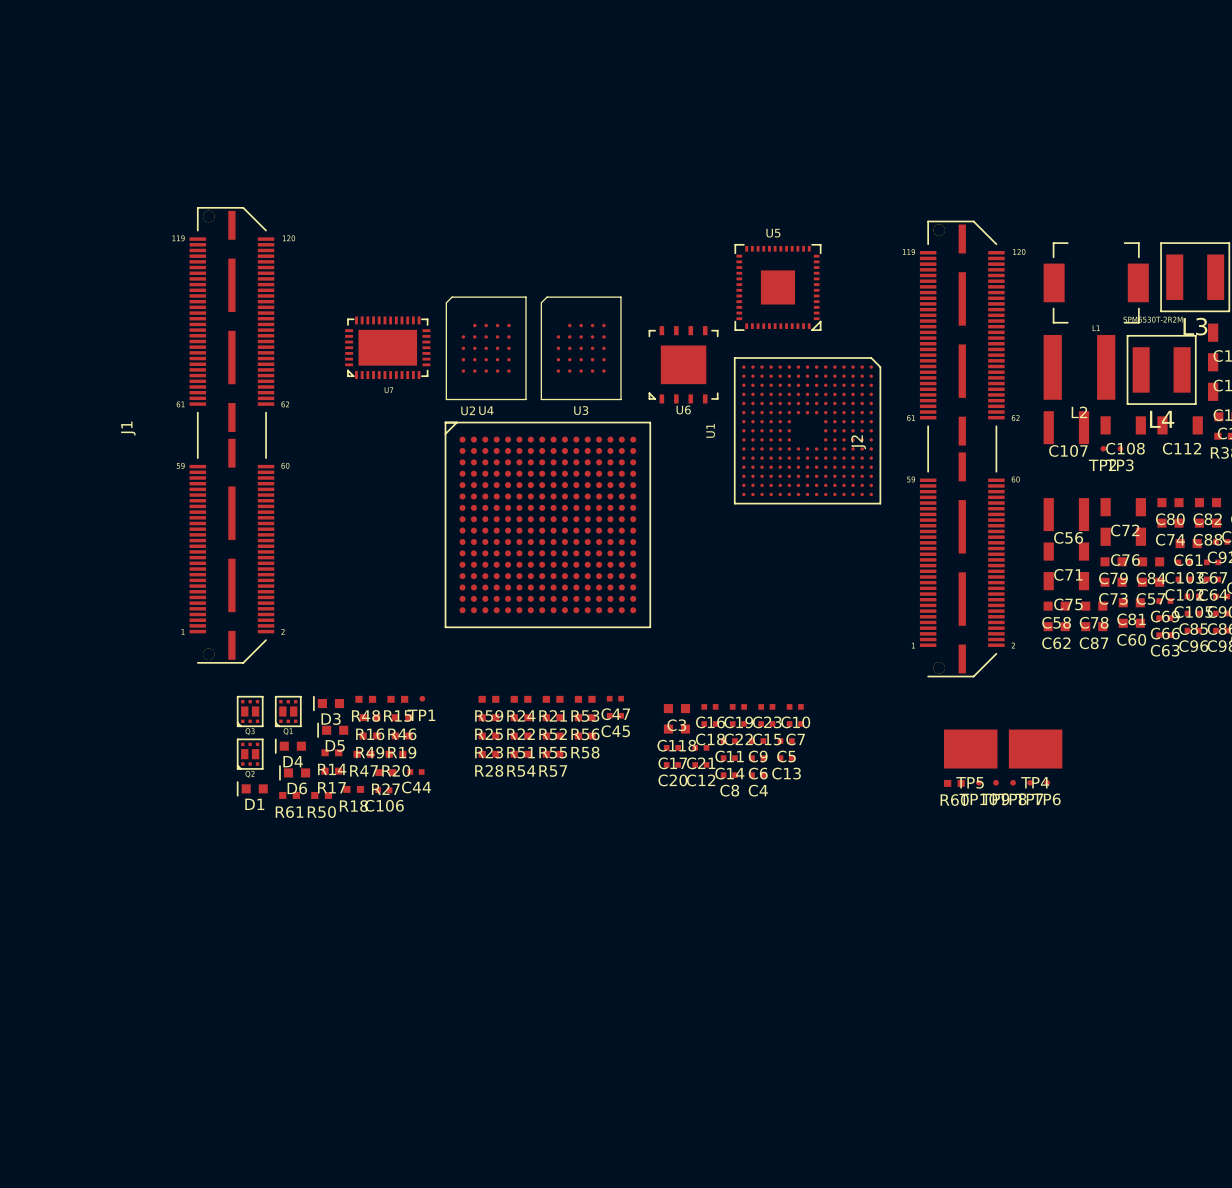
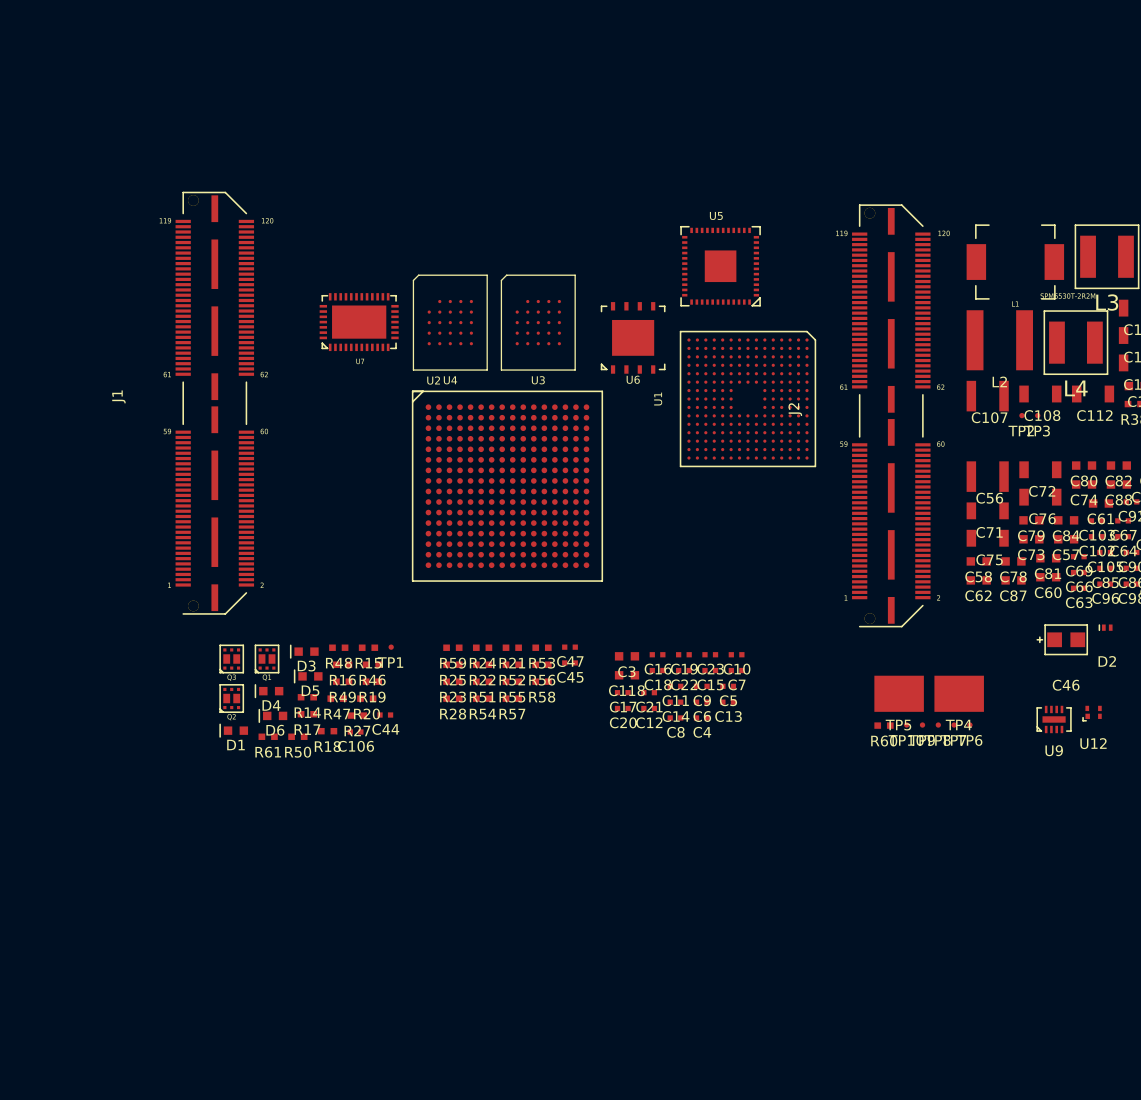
D2: none -> (1105, 627)
C46: none -> (1062, 639)
U12: none -> (1092, 713)
U9: none -> (1054, 719)

